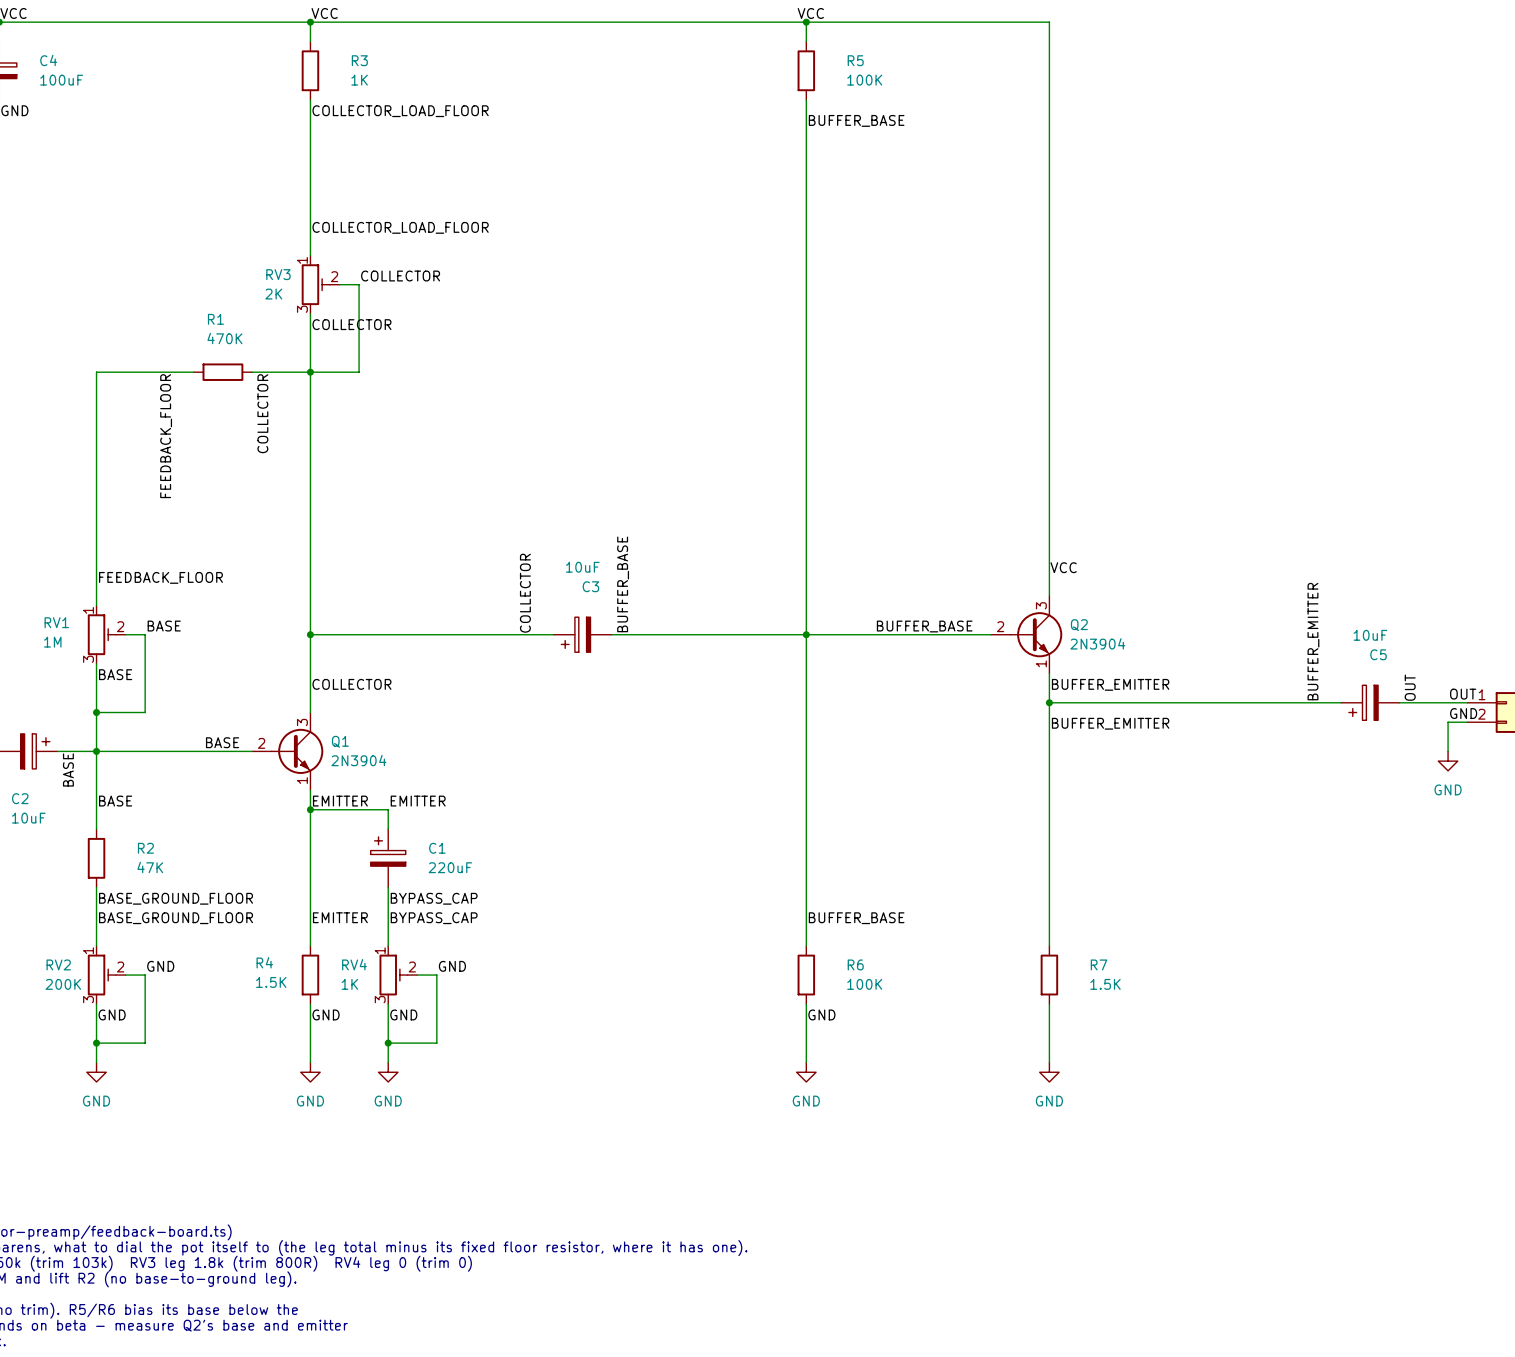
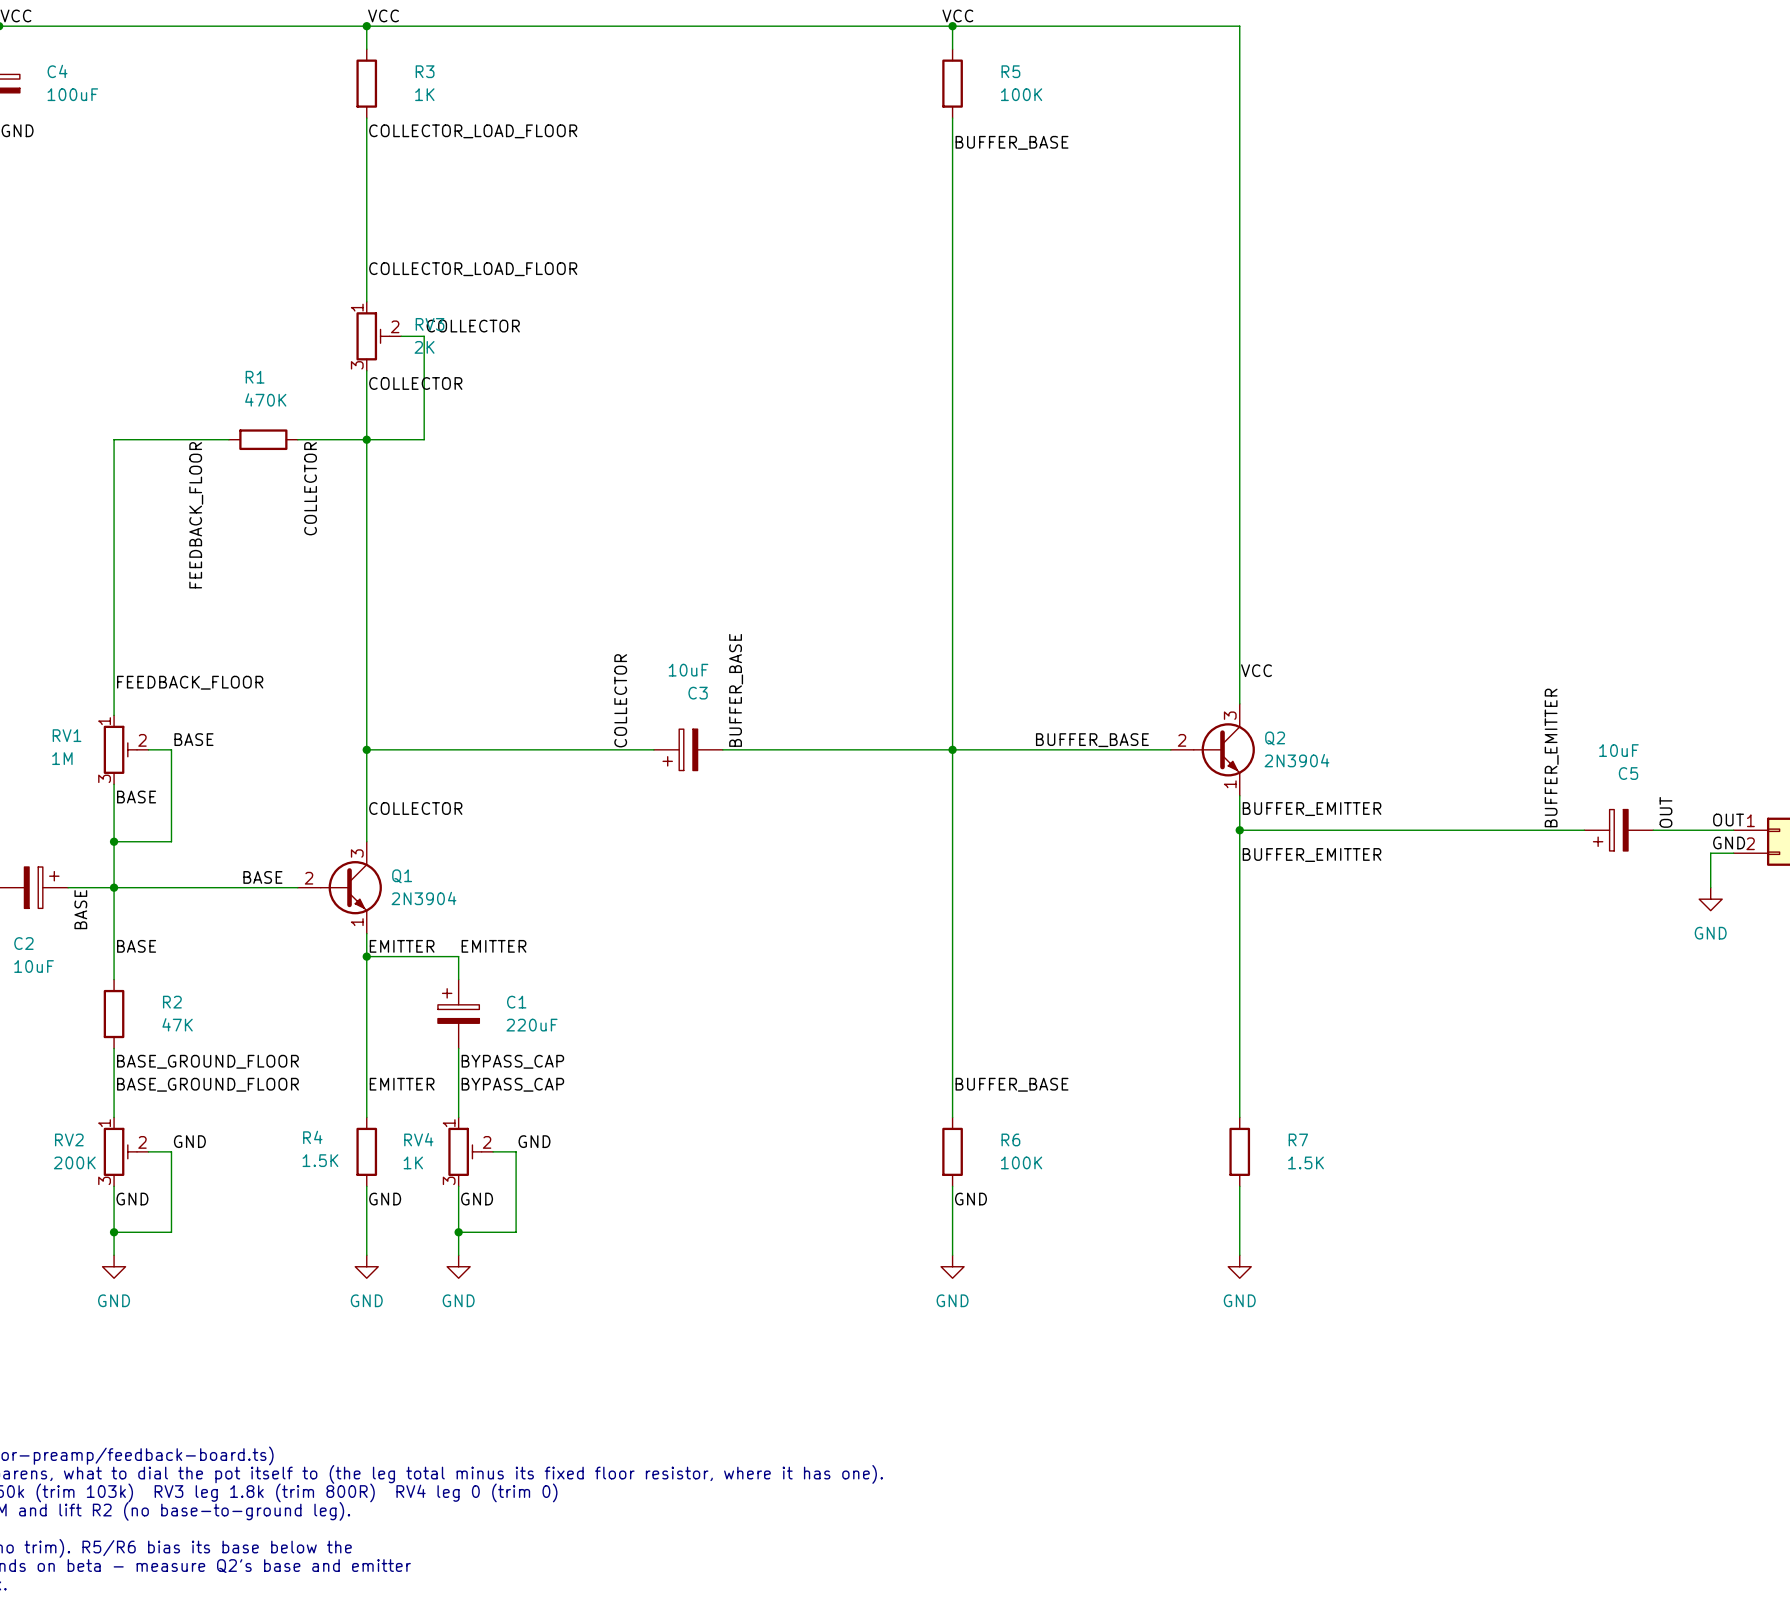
RV3 name position: RV3 (278, 274) -> RV3 (430, 324)
RV3 value position: 2K (273, 294) -> 2K (424, 347)

